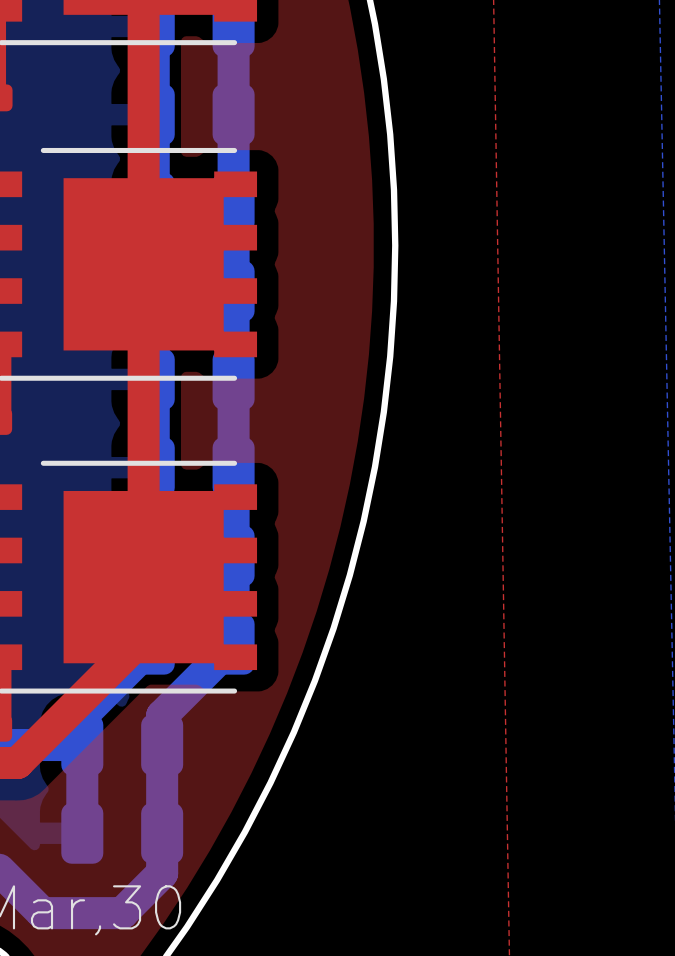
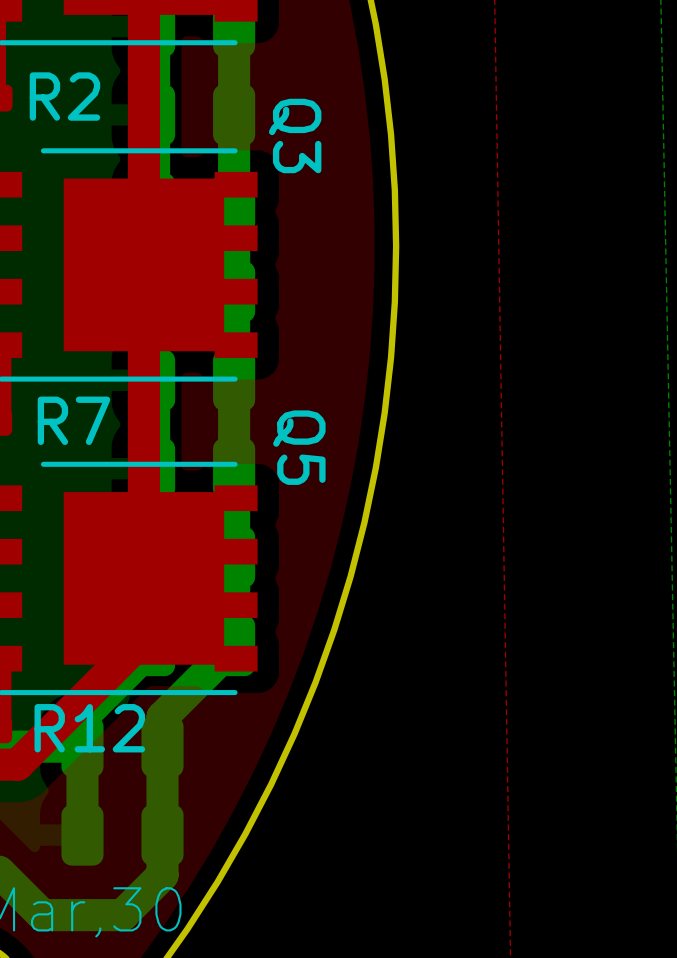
R2 name: none -> R2 (64, 96)
Q3 name: none -> Q3 (295, 135)
R7 name: none -> R7 (73, 420)
Q5 name: none -> Q5 (299, 447)
R12 name: none -> R12 (89, 728)

